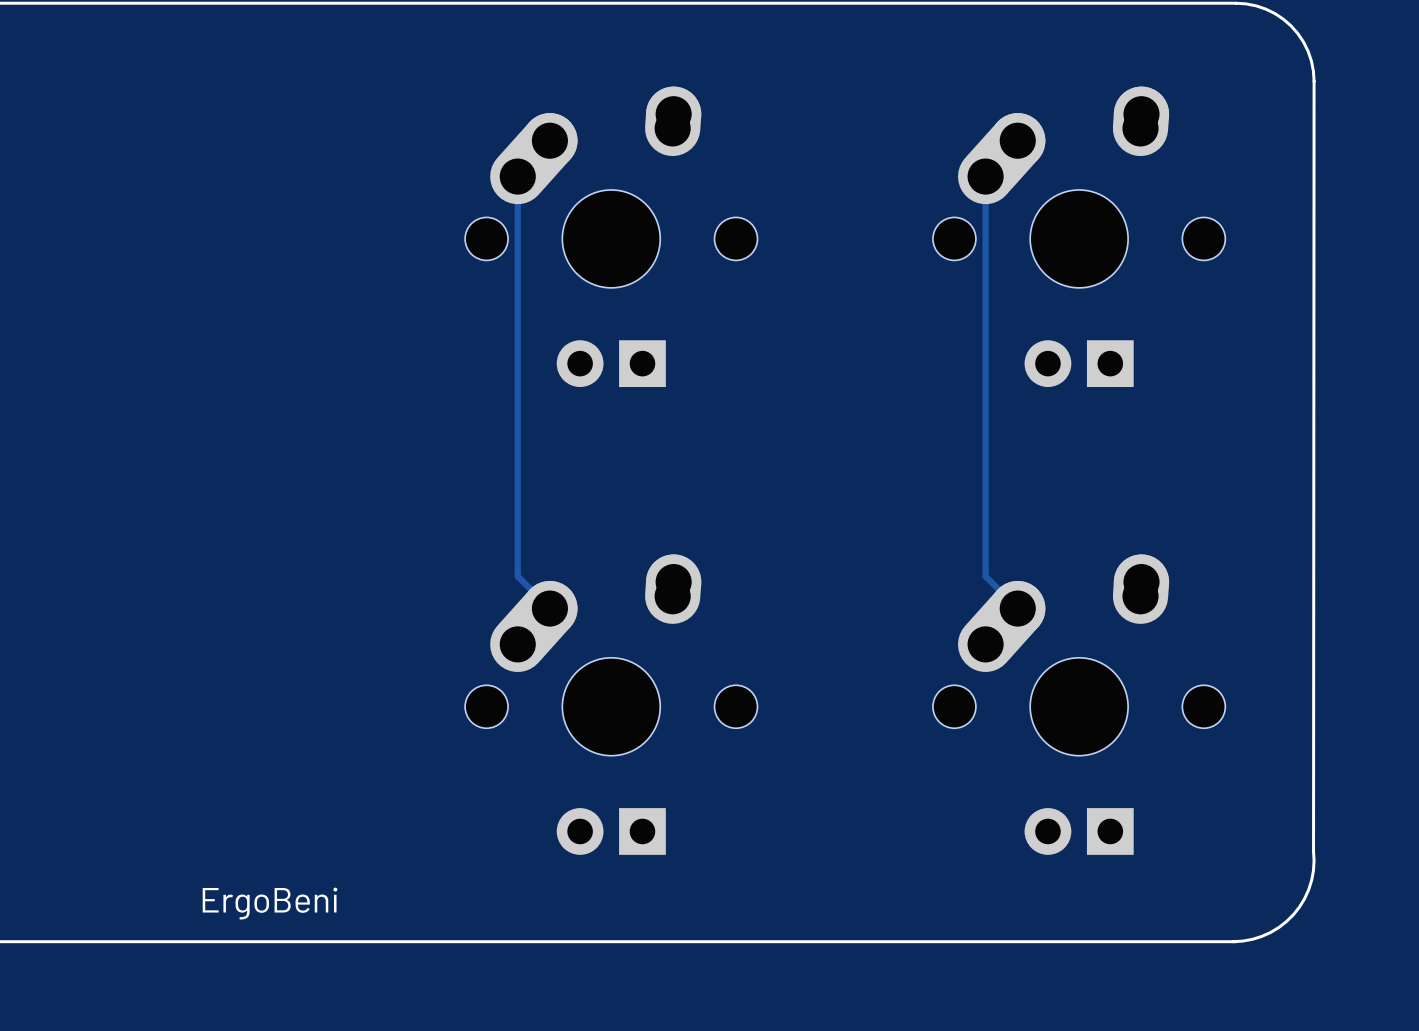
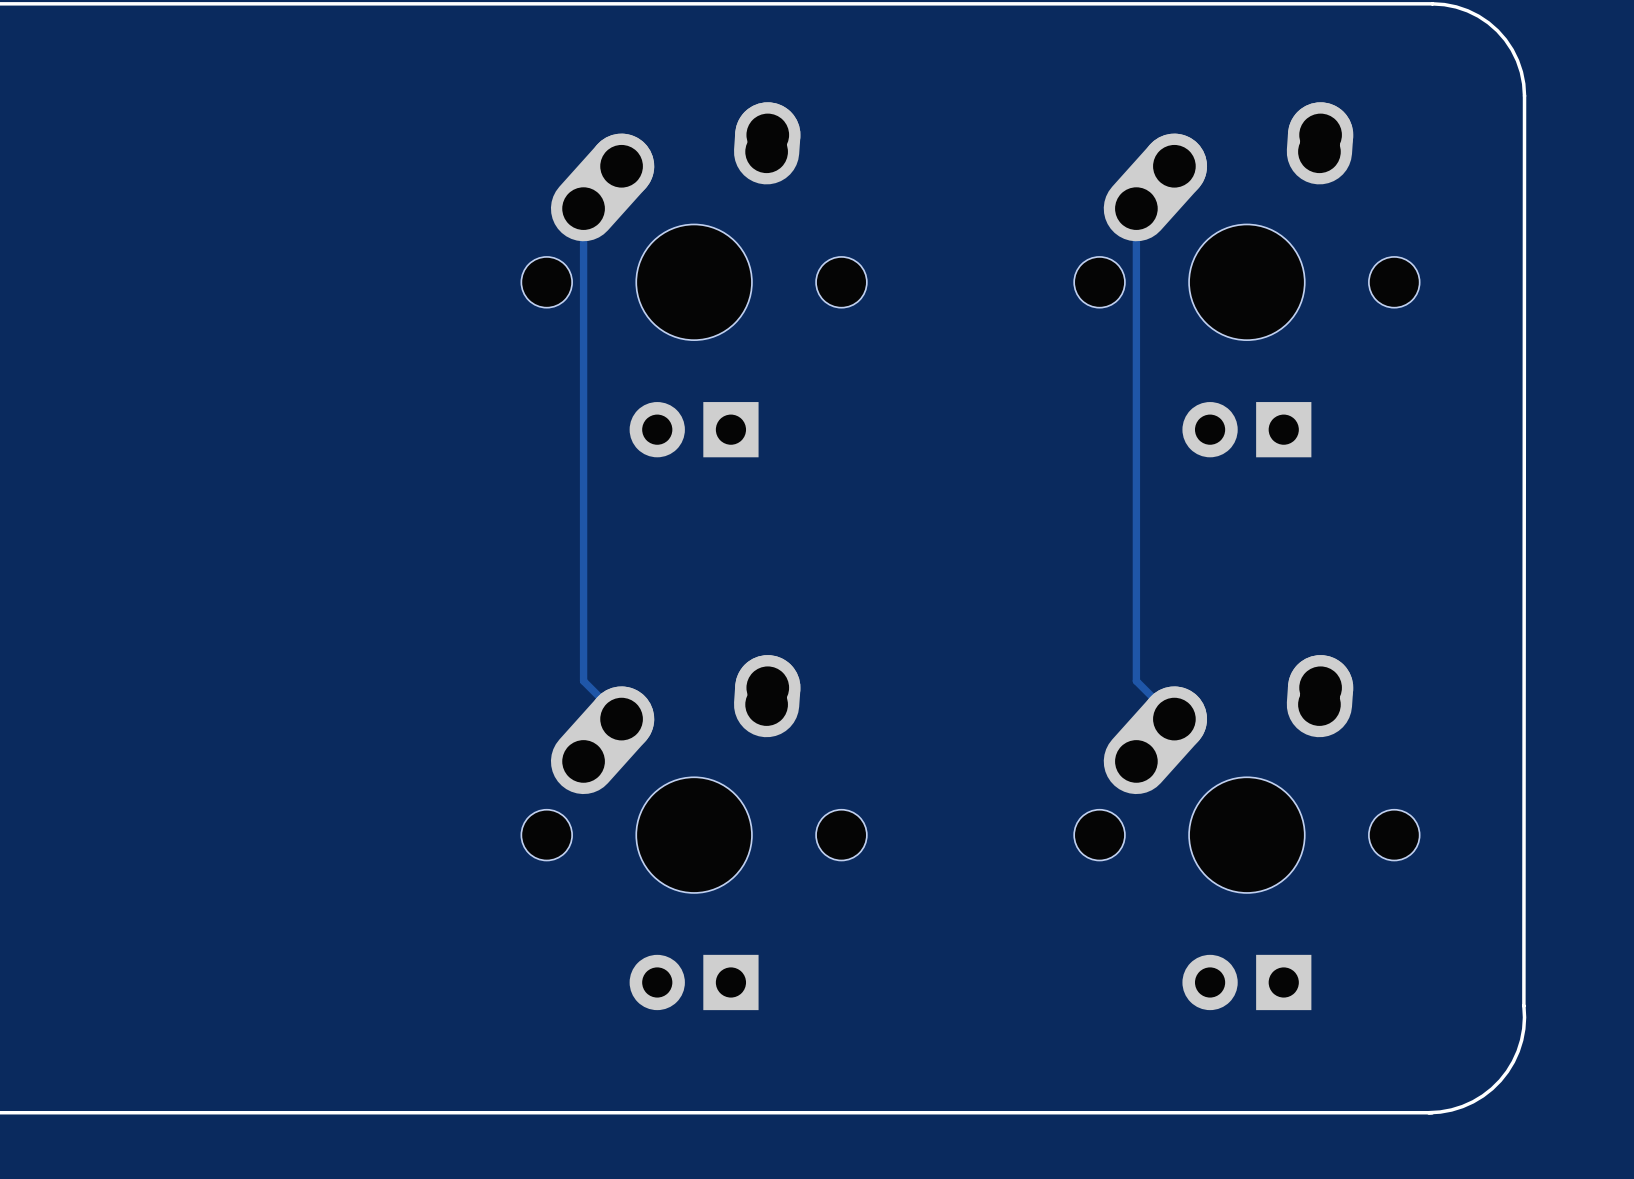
text: ErgoBeni (270, 903) -> none

